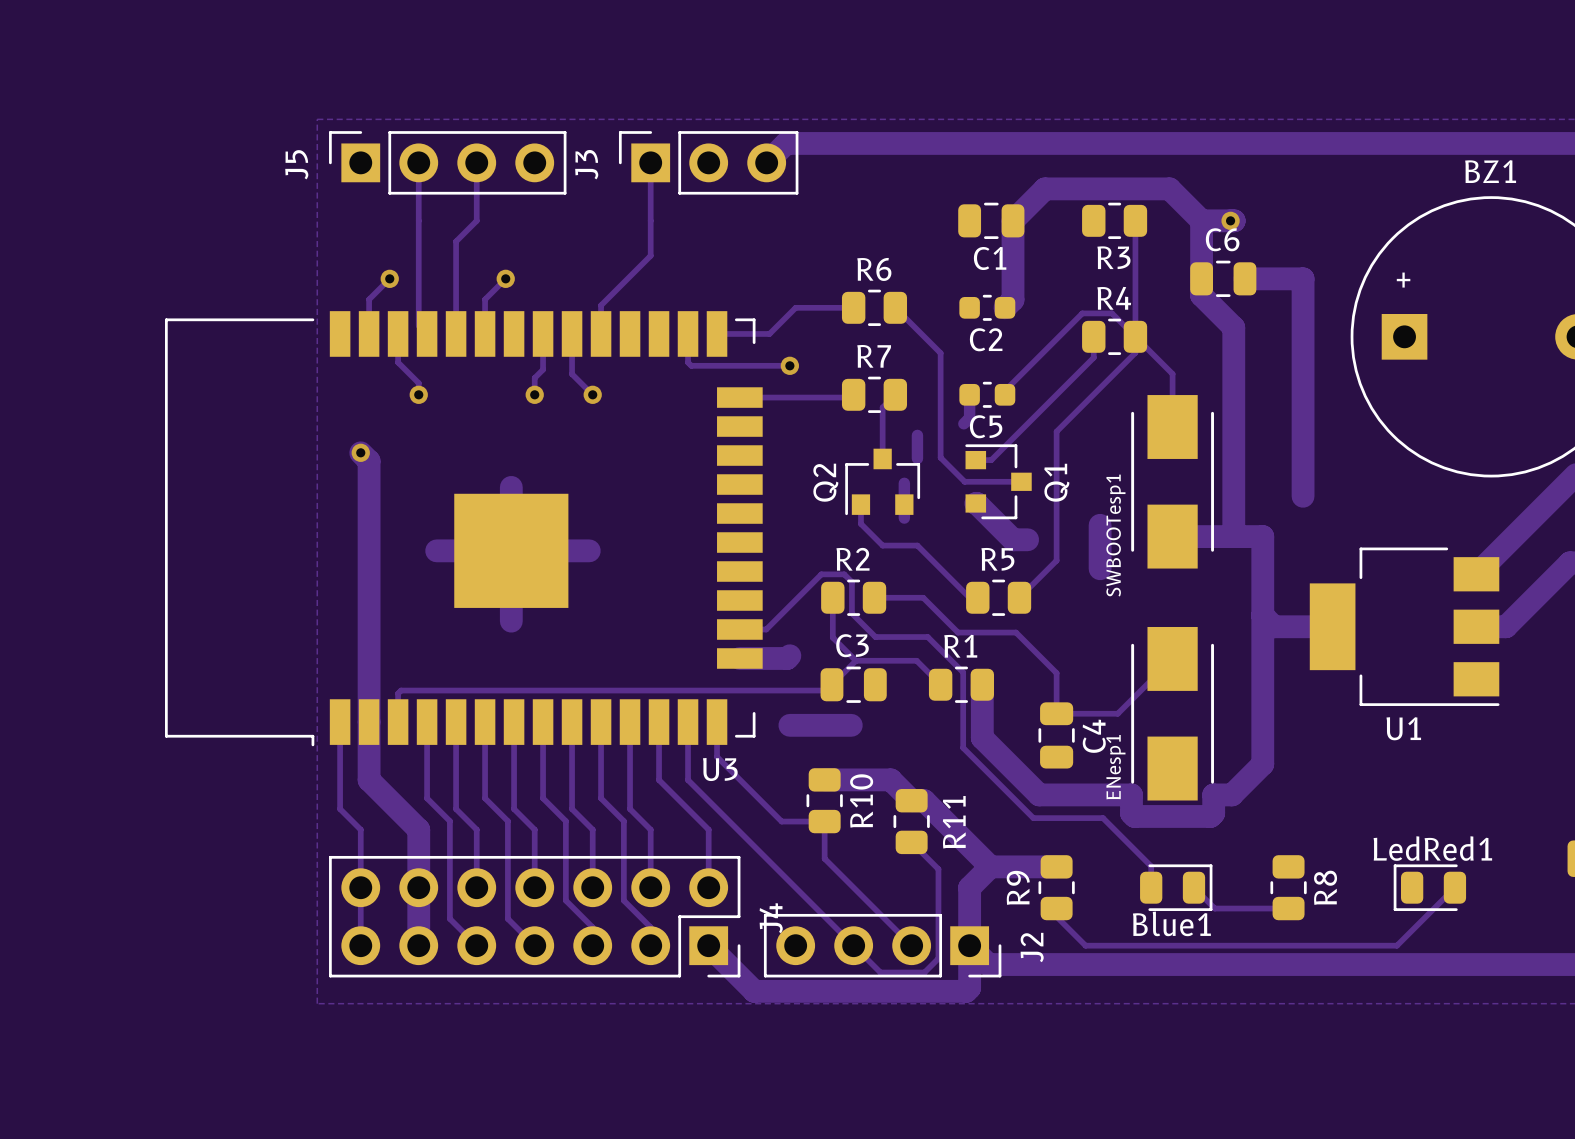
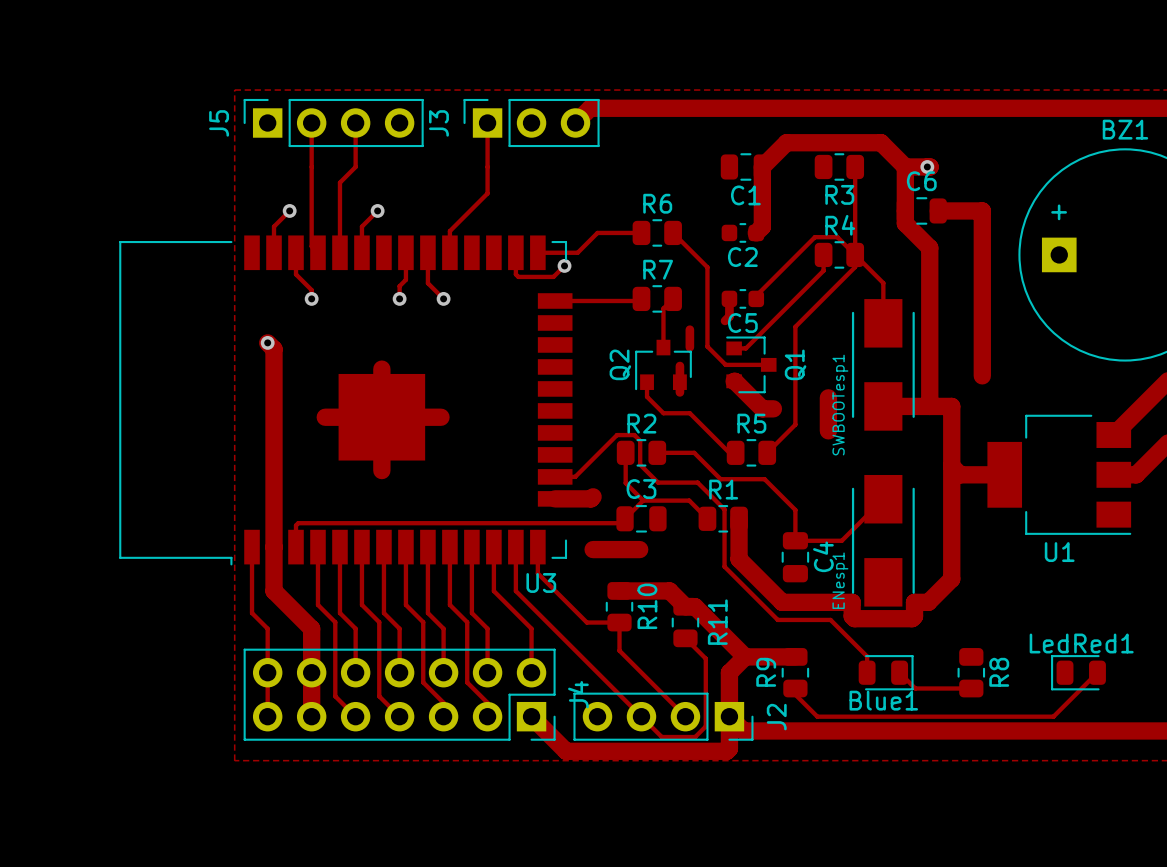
track: (737, 365) (789, 365) -> (553, 276) (564, 265)
via position: (789, 365) -> (564, 265)

